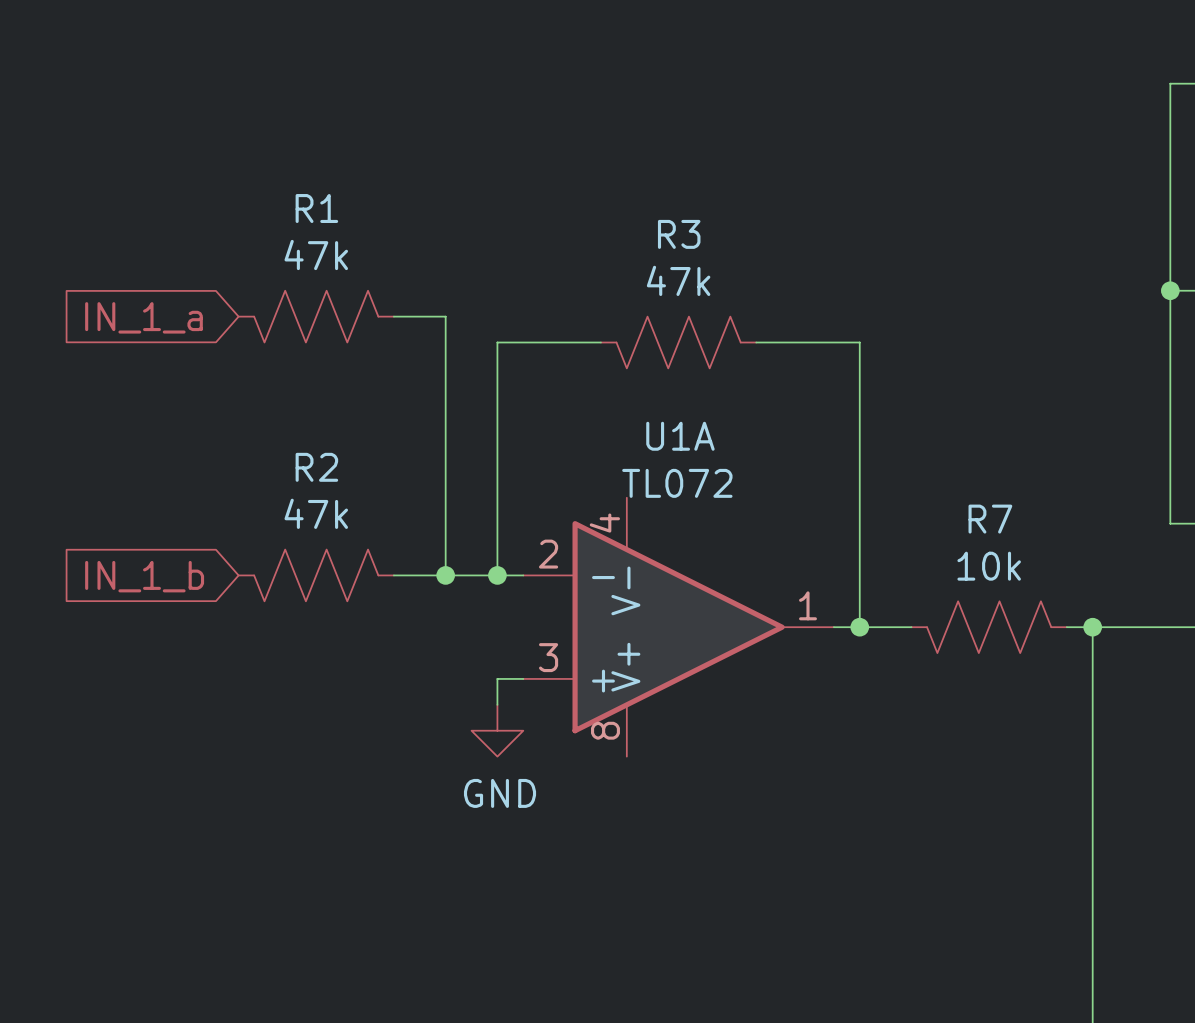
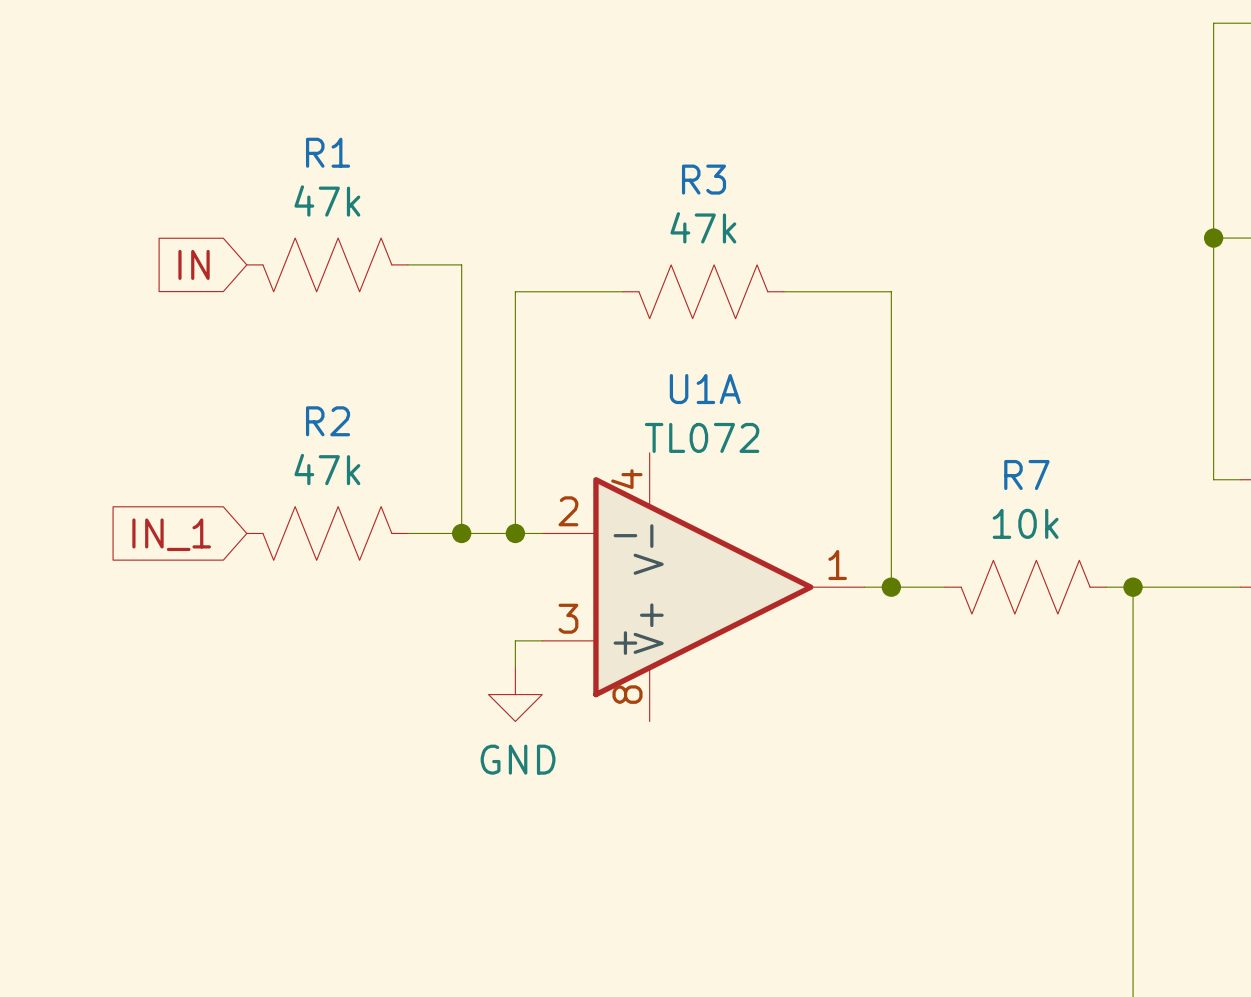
global label: IN_1_a (143, 317) -> IN (194, 264)
global label: IN_1_b (144, 576) -> IN_1 (171, 534)

